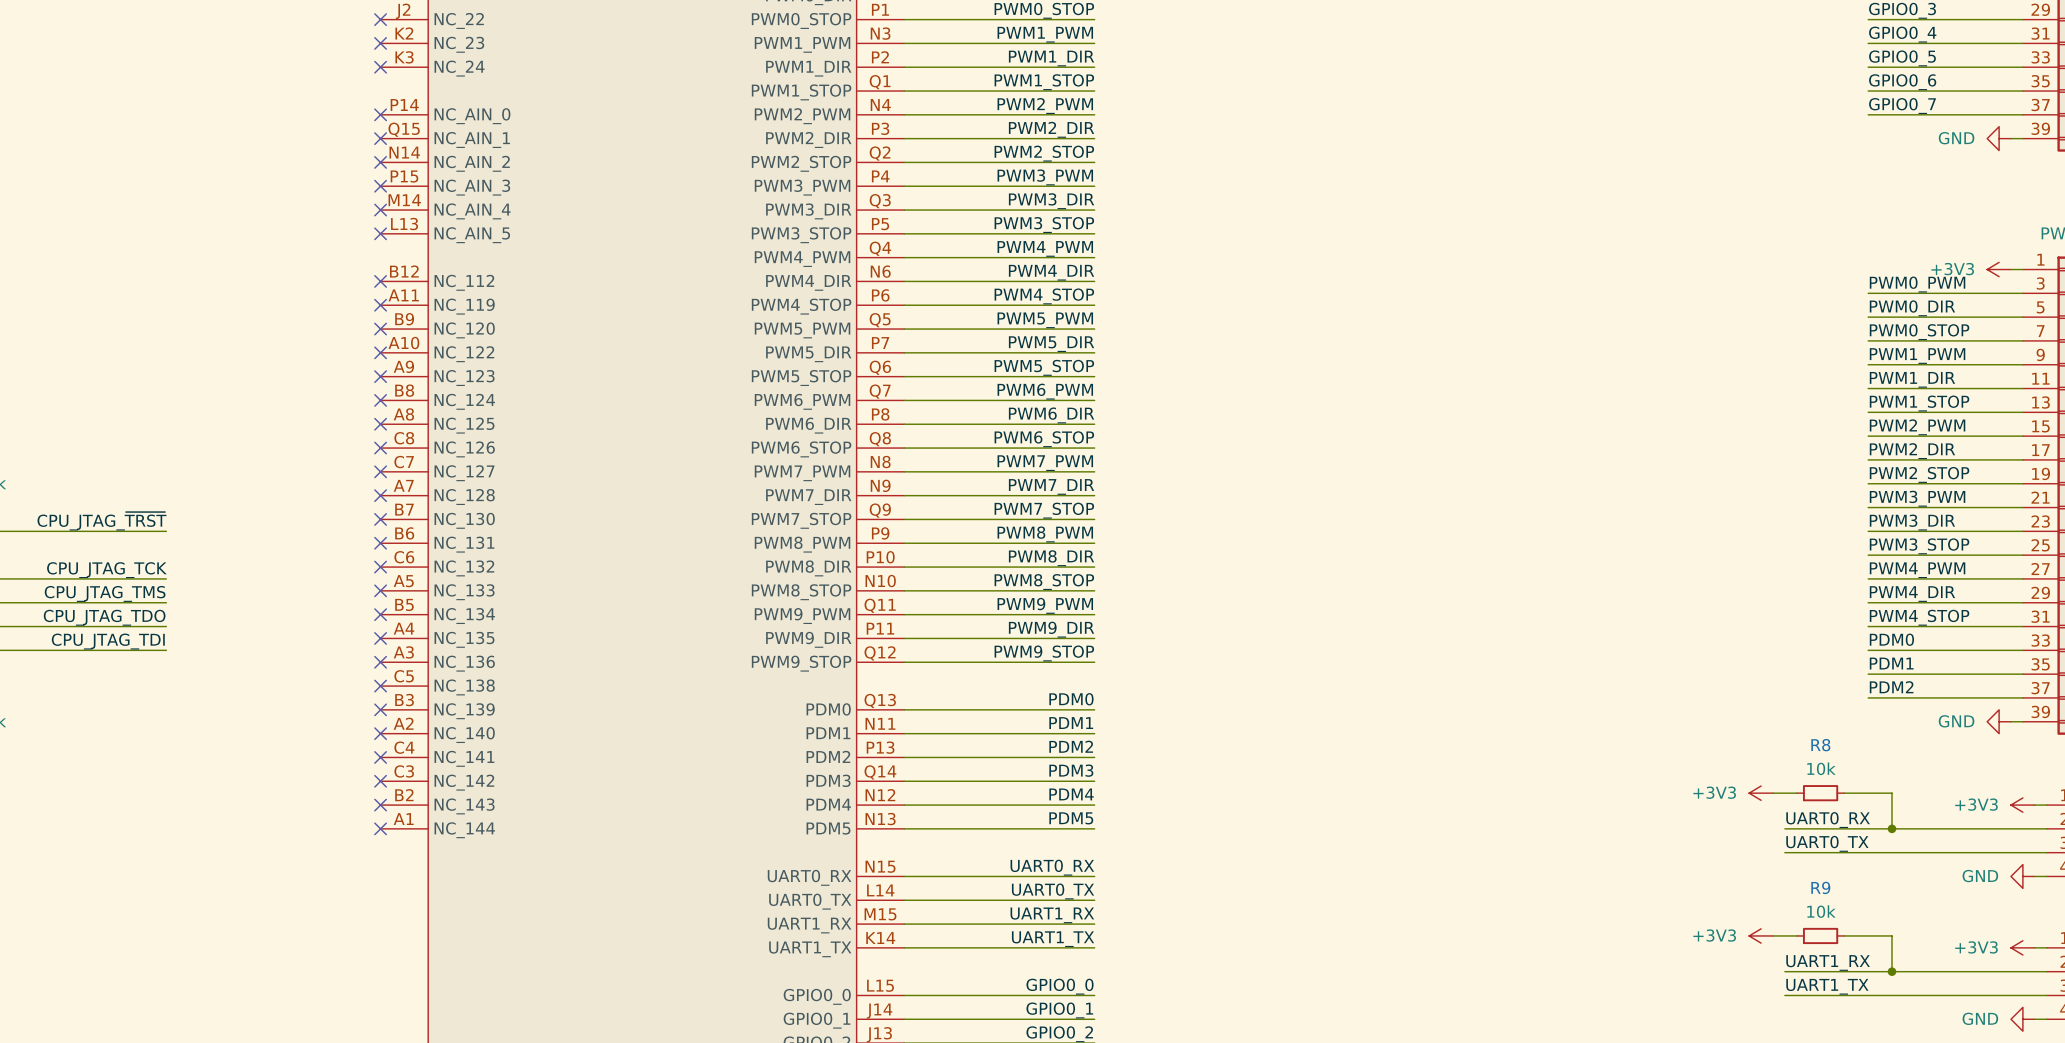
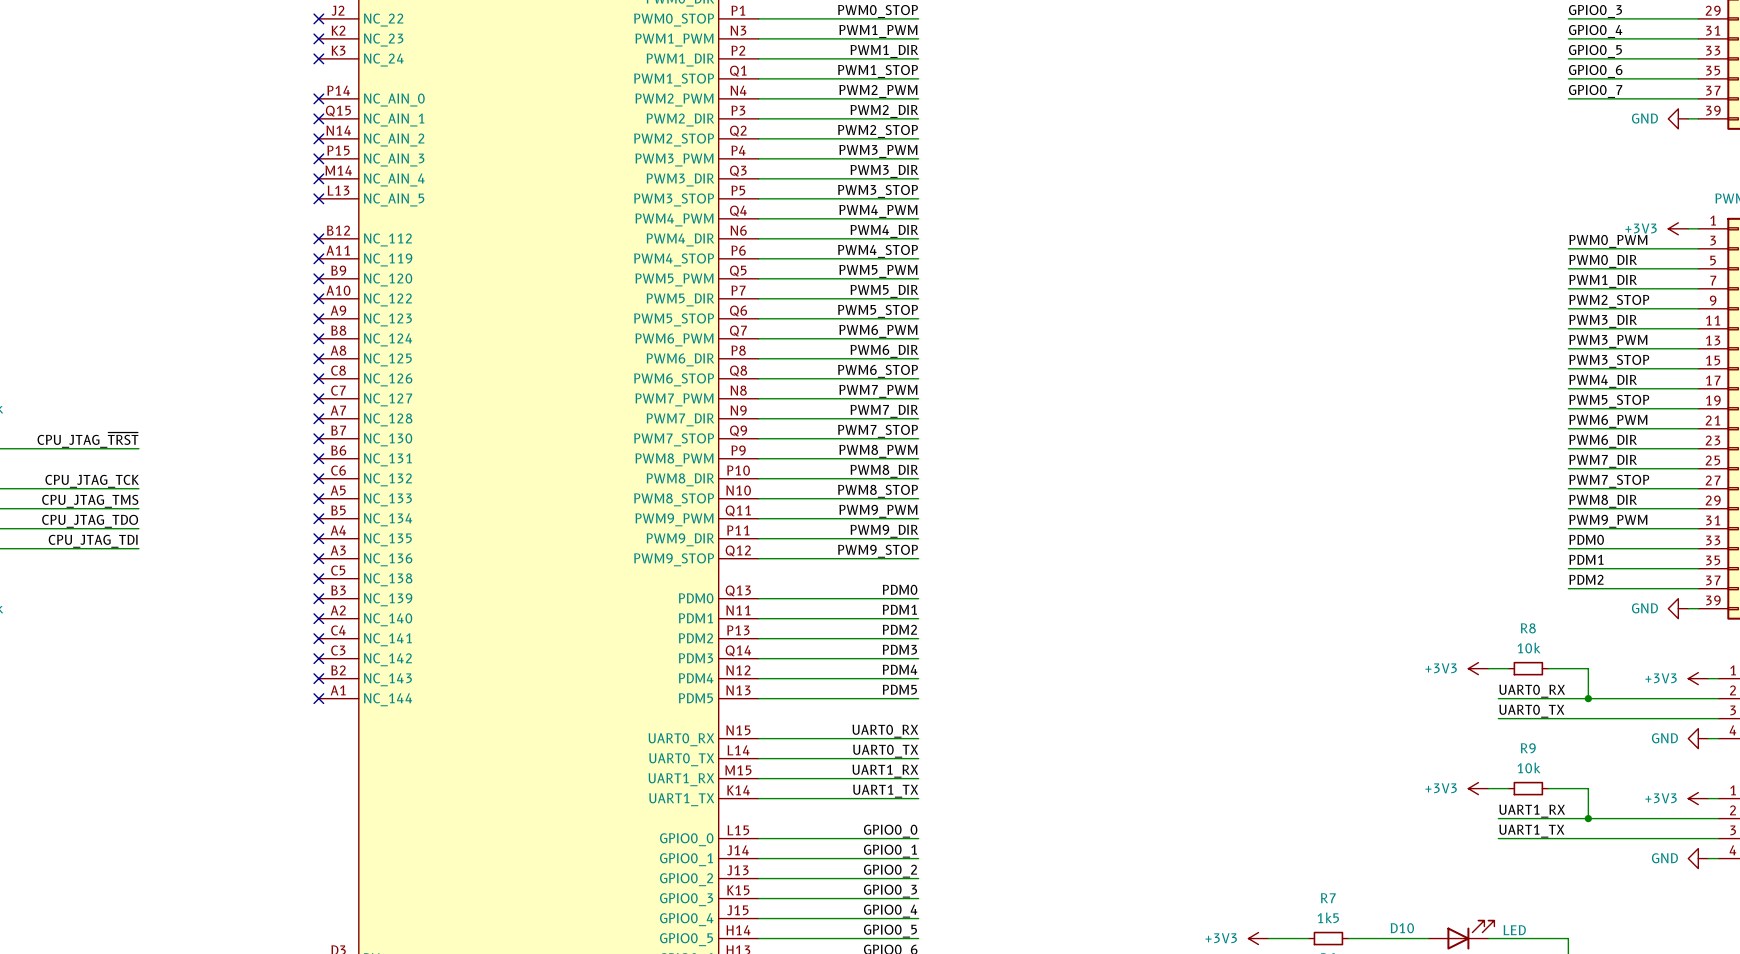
label: PWM0_STOP (1919, 332) -> PWM1_DIR (1603, 281)
label: PWM1_PWM (1917, 356) -> PWM2_STOP (1609, 301)
label: PWM1_DIR (1912, 379) -> PWM3_DIR (1603, 321)
label: PWM1_STOP (1919, 403) -> PWM3_PWM (1608, 341)
label: PWM2_PWM (1917, 427) -> PWM3_STOP (1609, 361)
label: PWM2_DIR (1912, 451) -> PWM4_DIR (1603, 381)
label: PWM2_STOP (1919, 474) -> PWM5_STOP (1609, 401)
label: PWM3_PWM (1917, 498) -> PWM6_PWM (1608, 421)
label: PWM3_DIR (1912, 522) -> PWM6_DIR (1603, 441)
label: PWM3_STOP (1919, 546) -> PWM7_DIR (1603, 461)
label: PWM4_PWM (1917, 570) -> PWM7_STOP (1609, 481)
label: PWM4_DIR (1912, 594) -> PWM8_DIR (1603, 501)
label: PWM4_STOP (1919, 617) -> PWM9_PWM (1608, 521)

